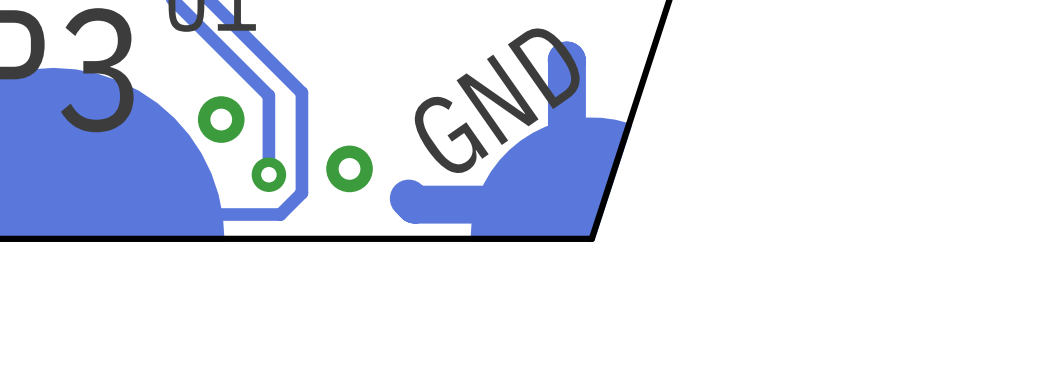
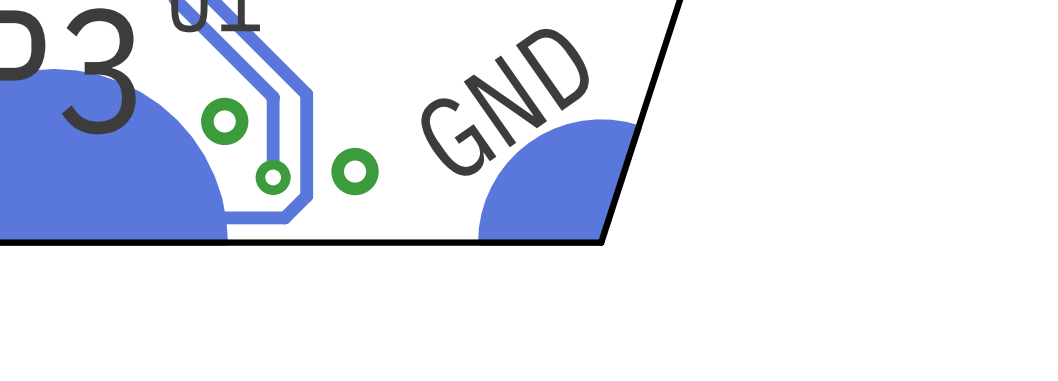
track: (566, 60) (566, 204) (414, 204) (408, 198) -> none

